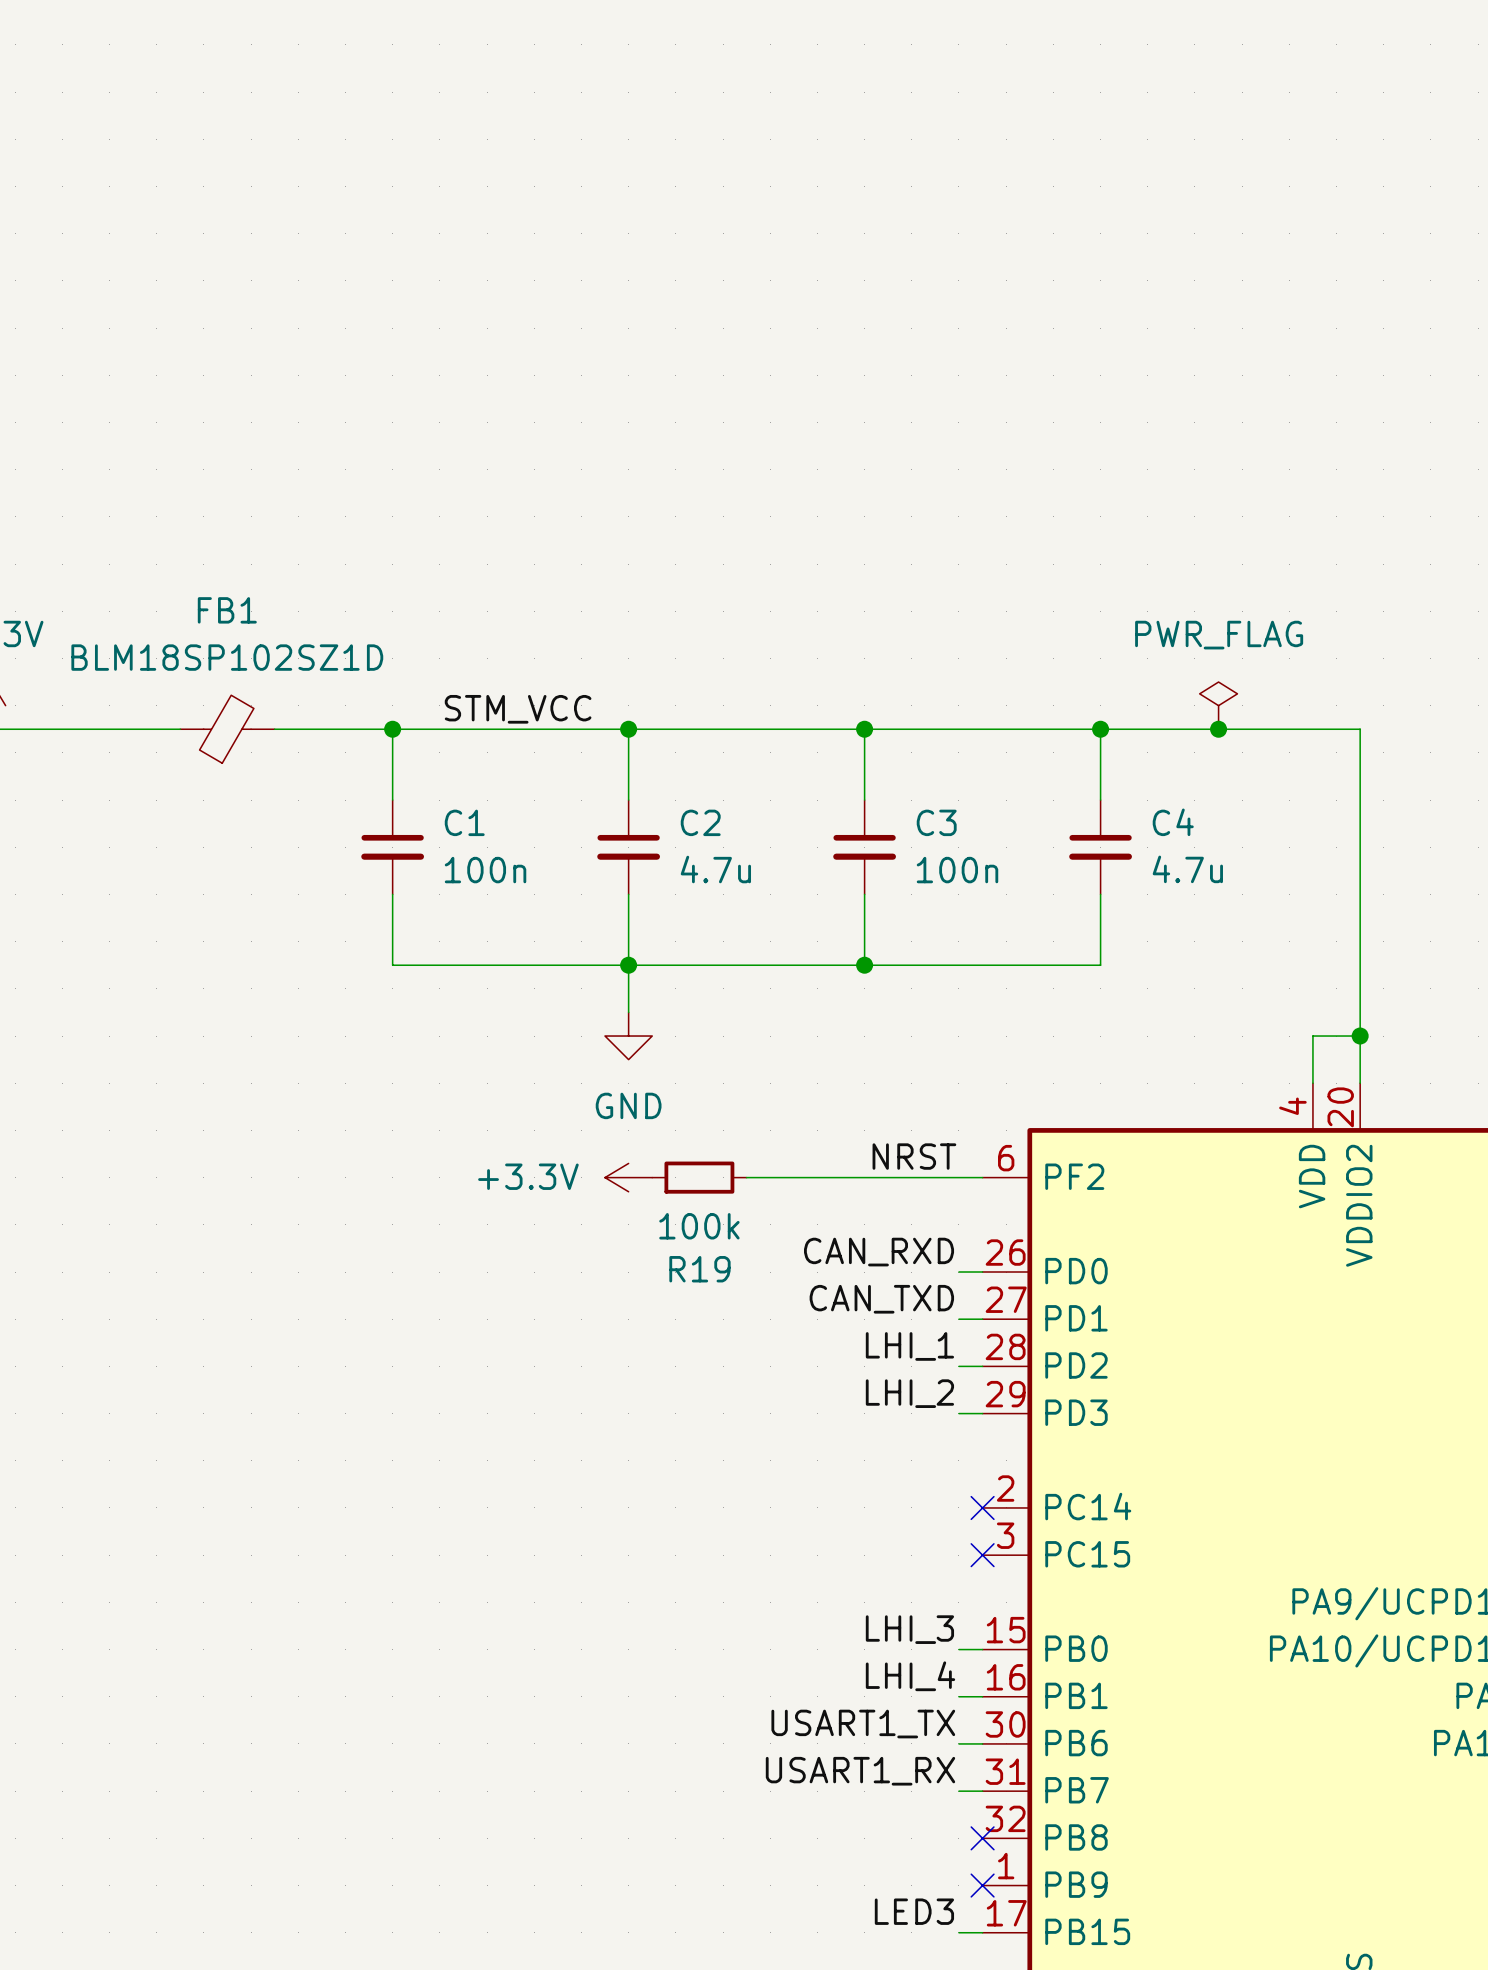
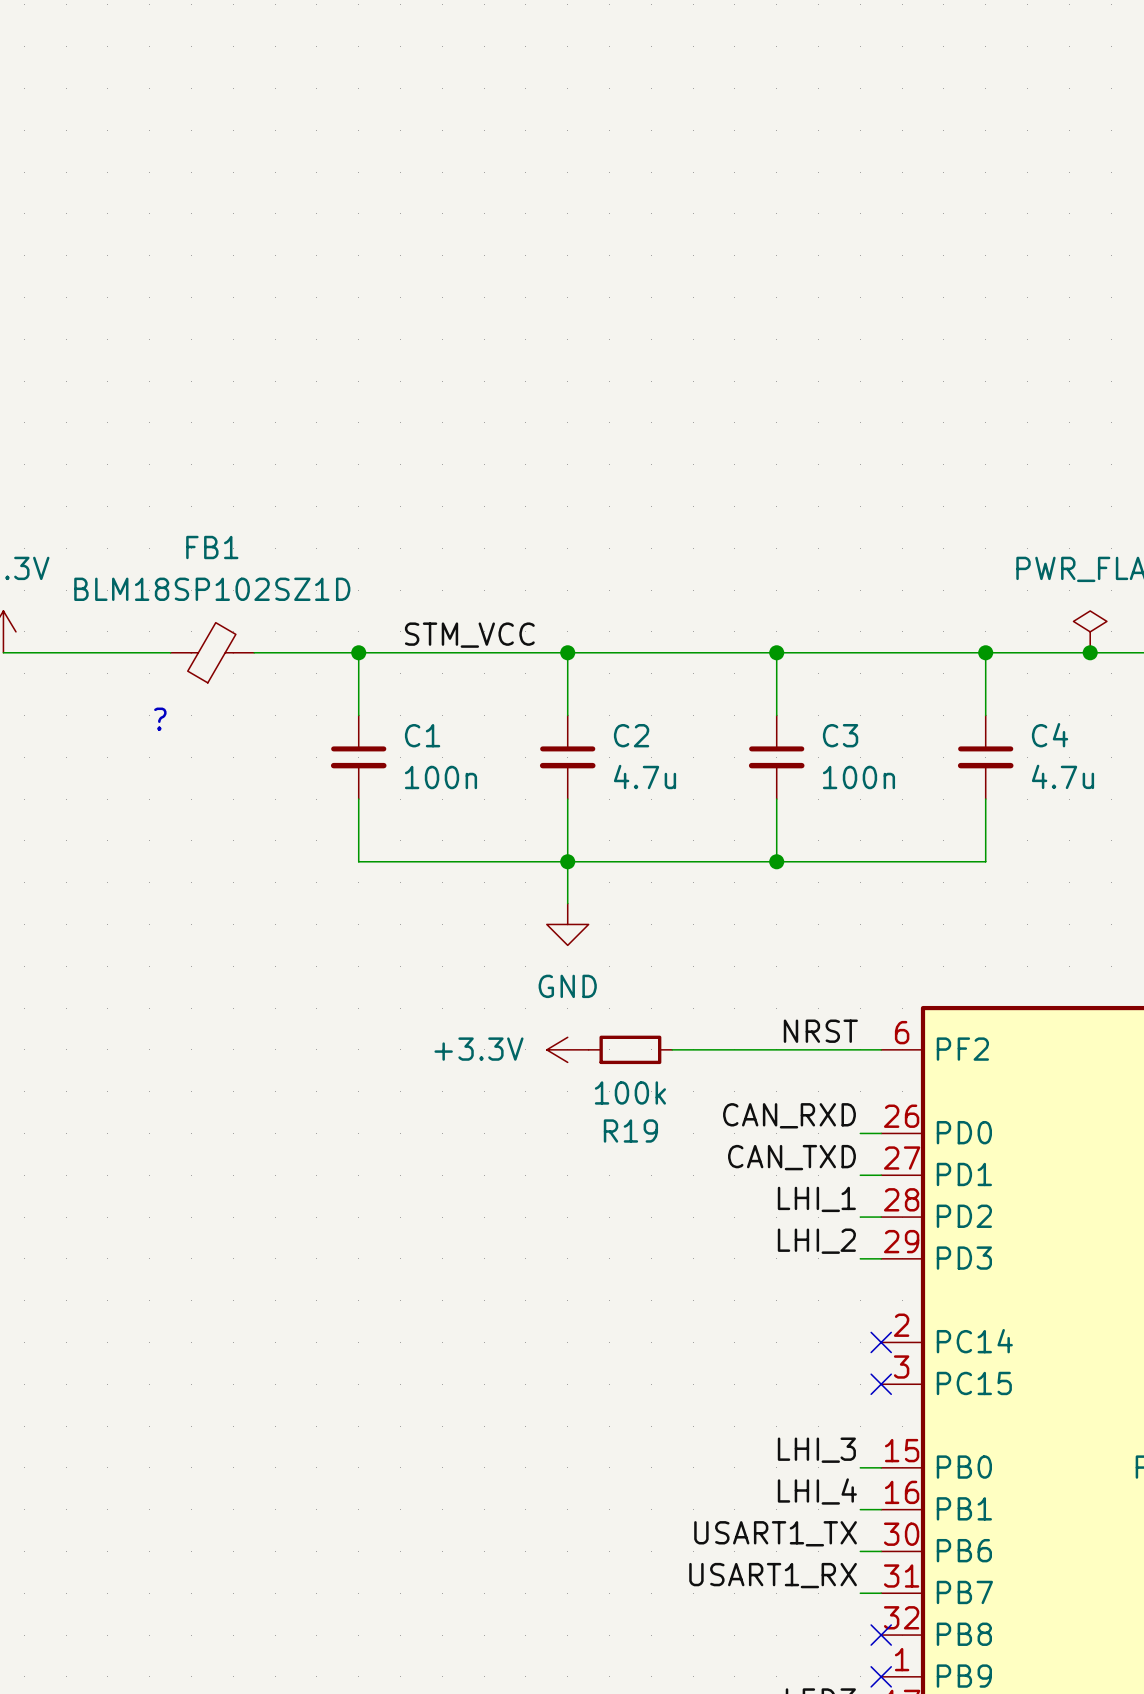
text: none -> ? (160, 719)

